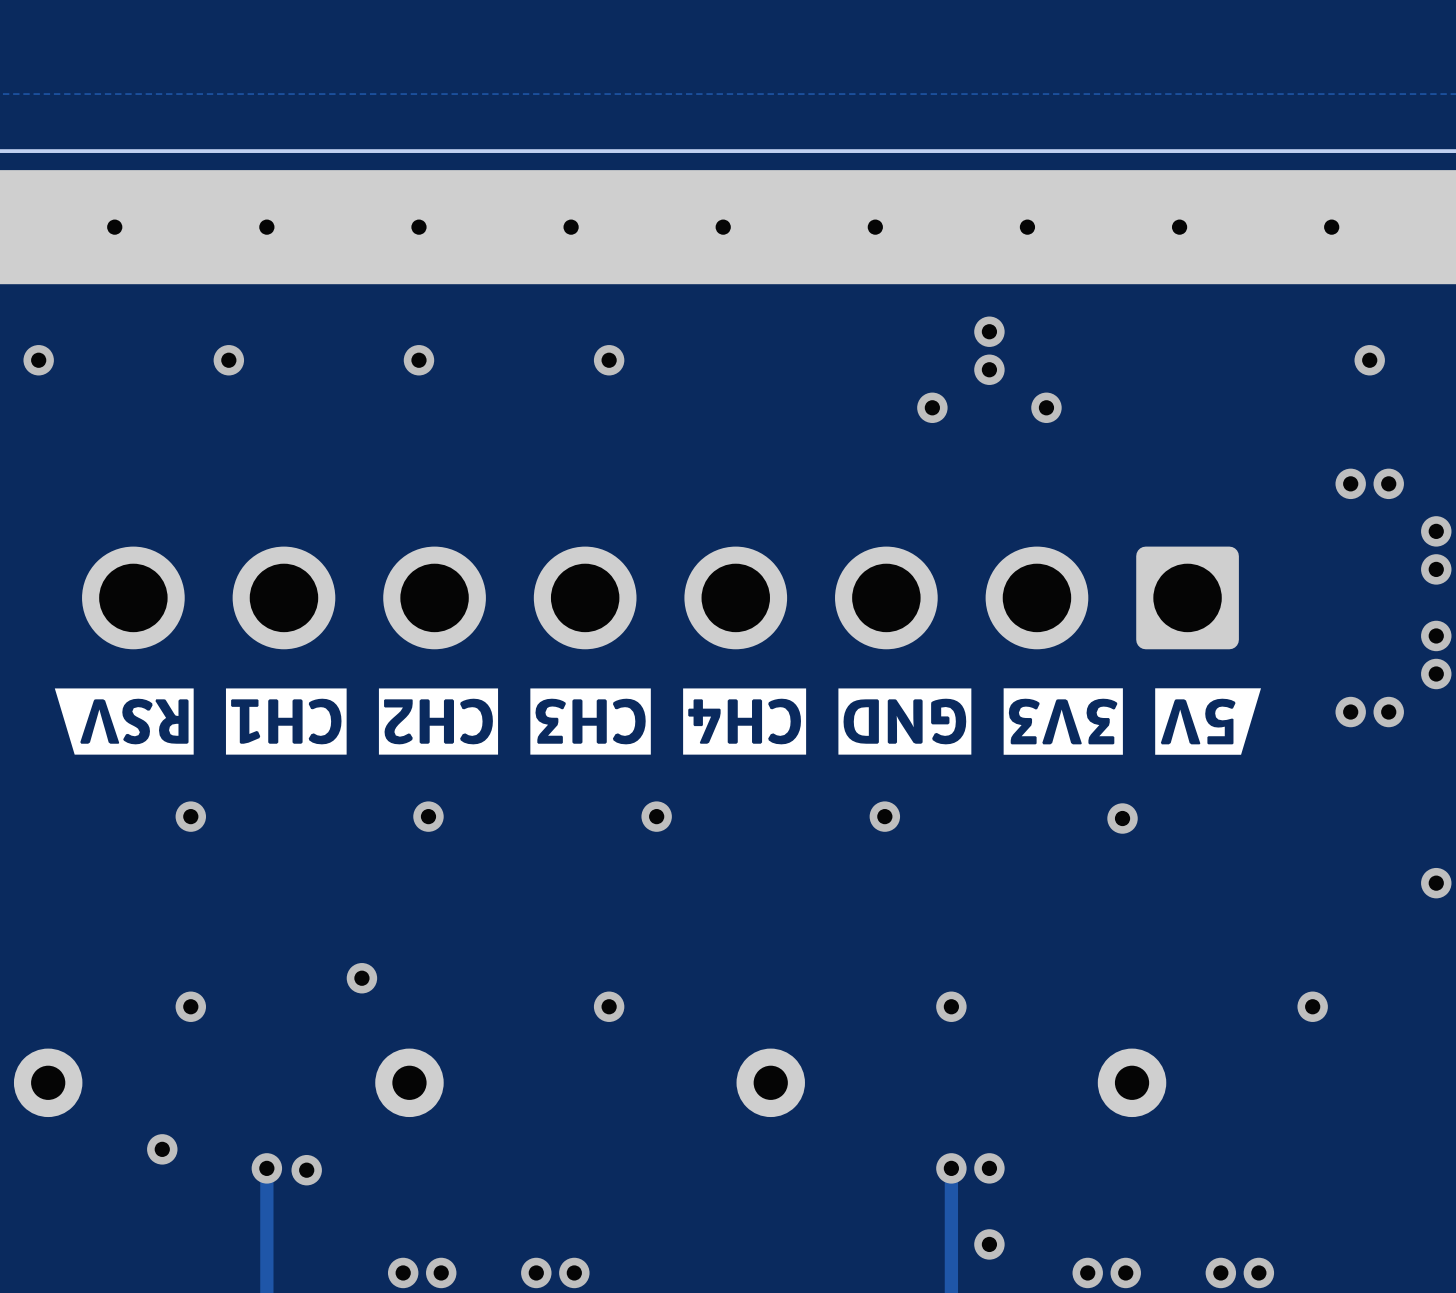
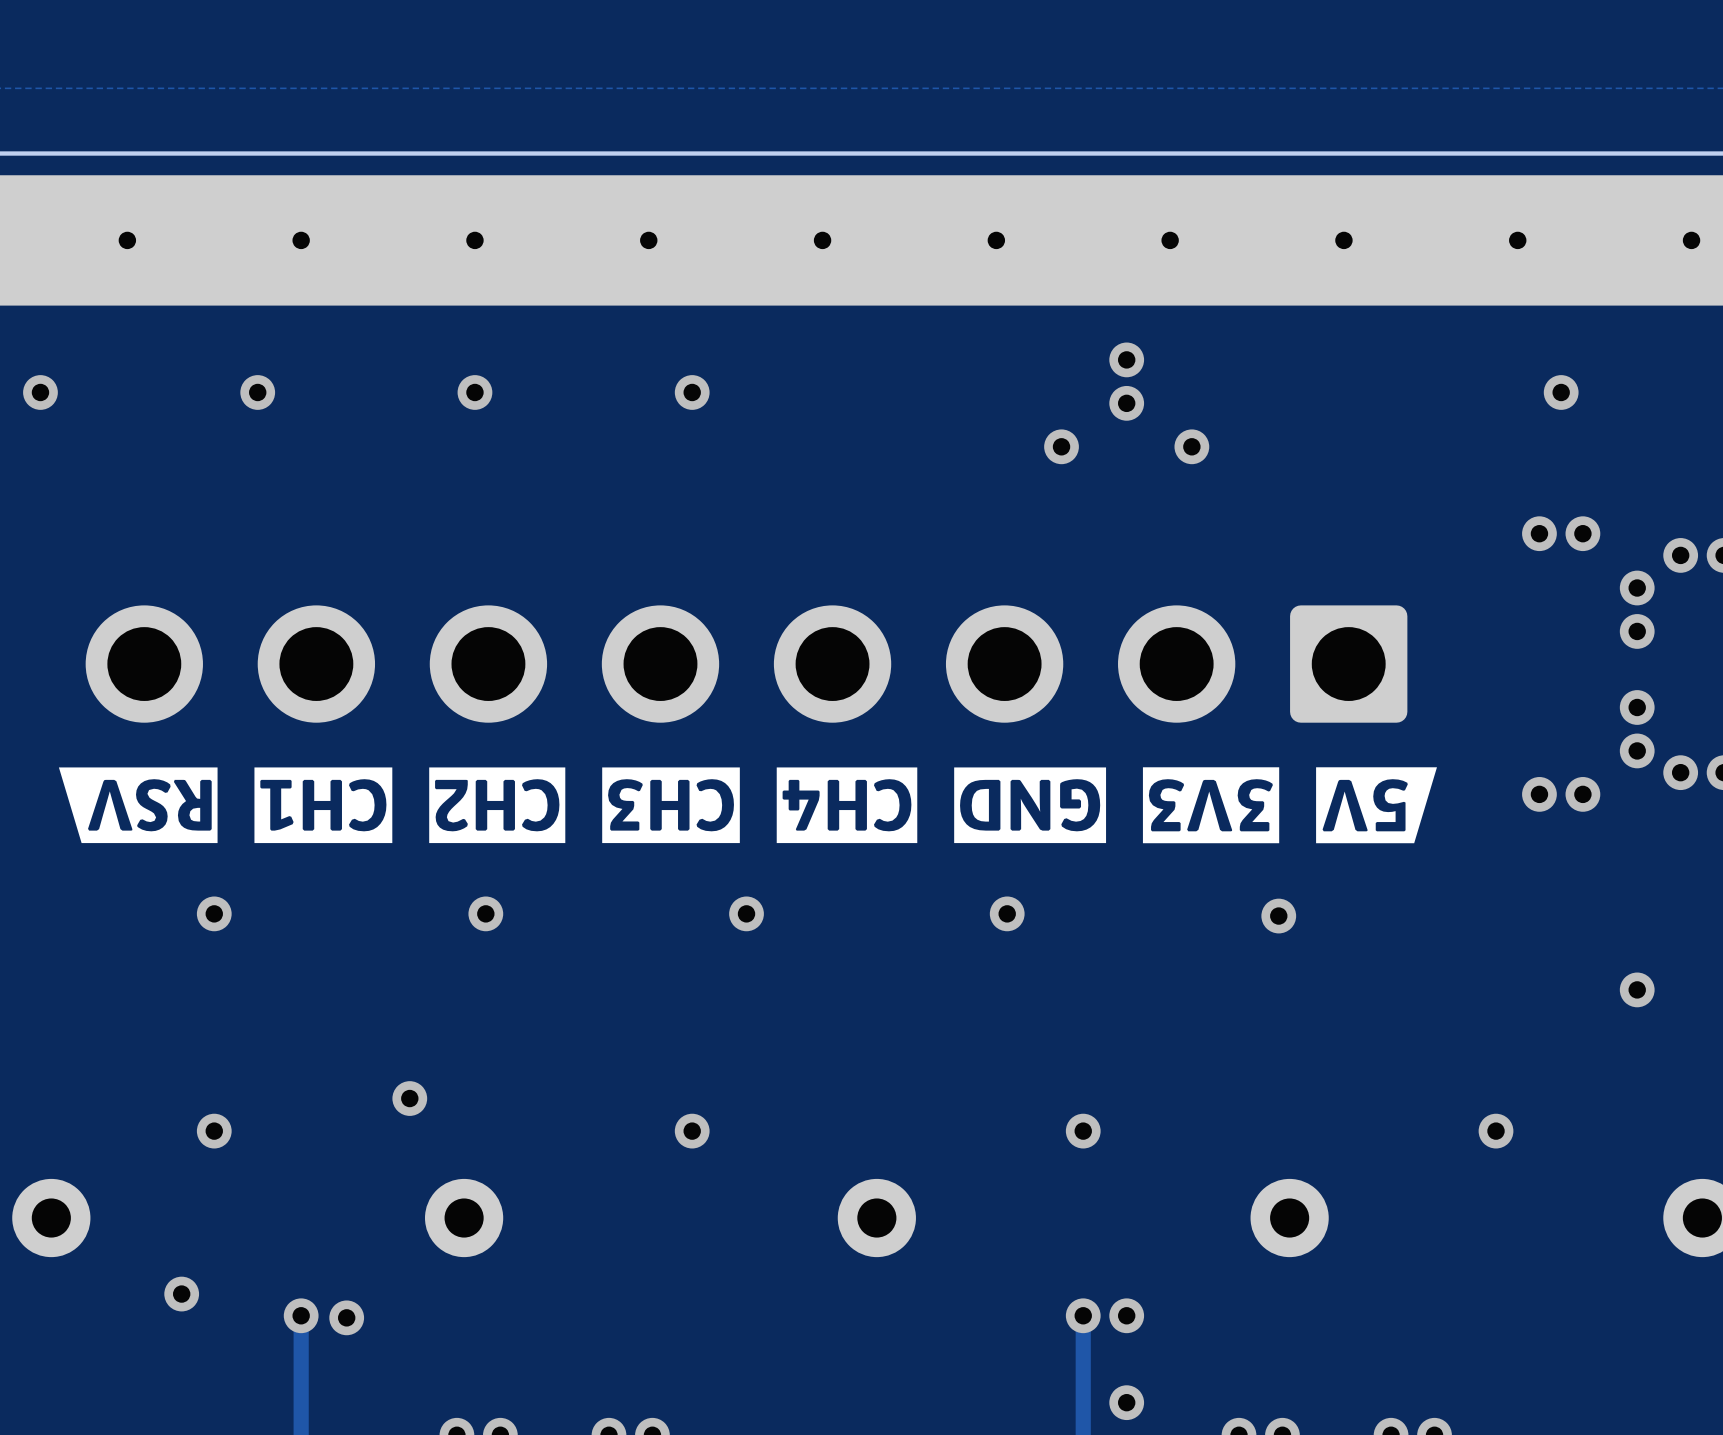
part footprint: [82, 546, 1239, 650] -> [85, 605, 1408, 723]

